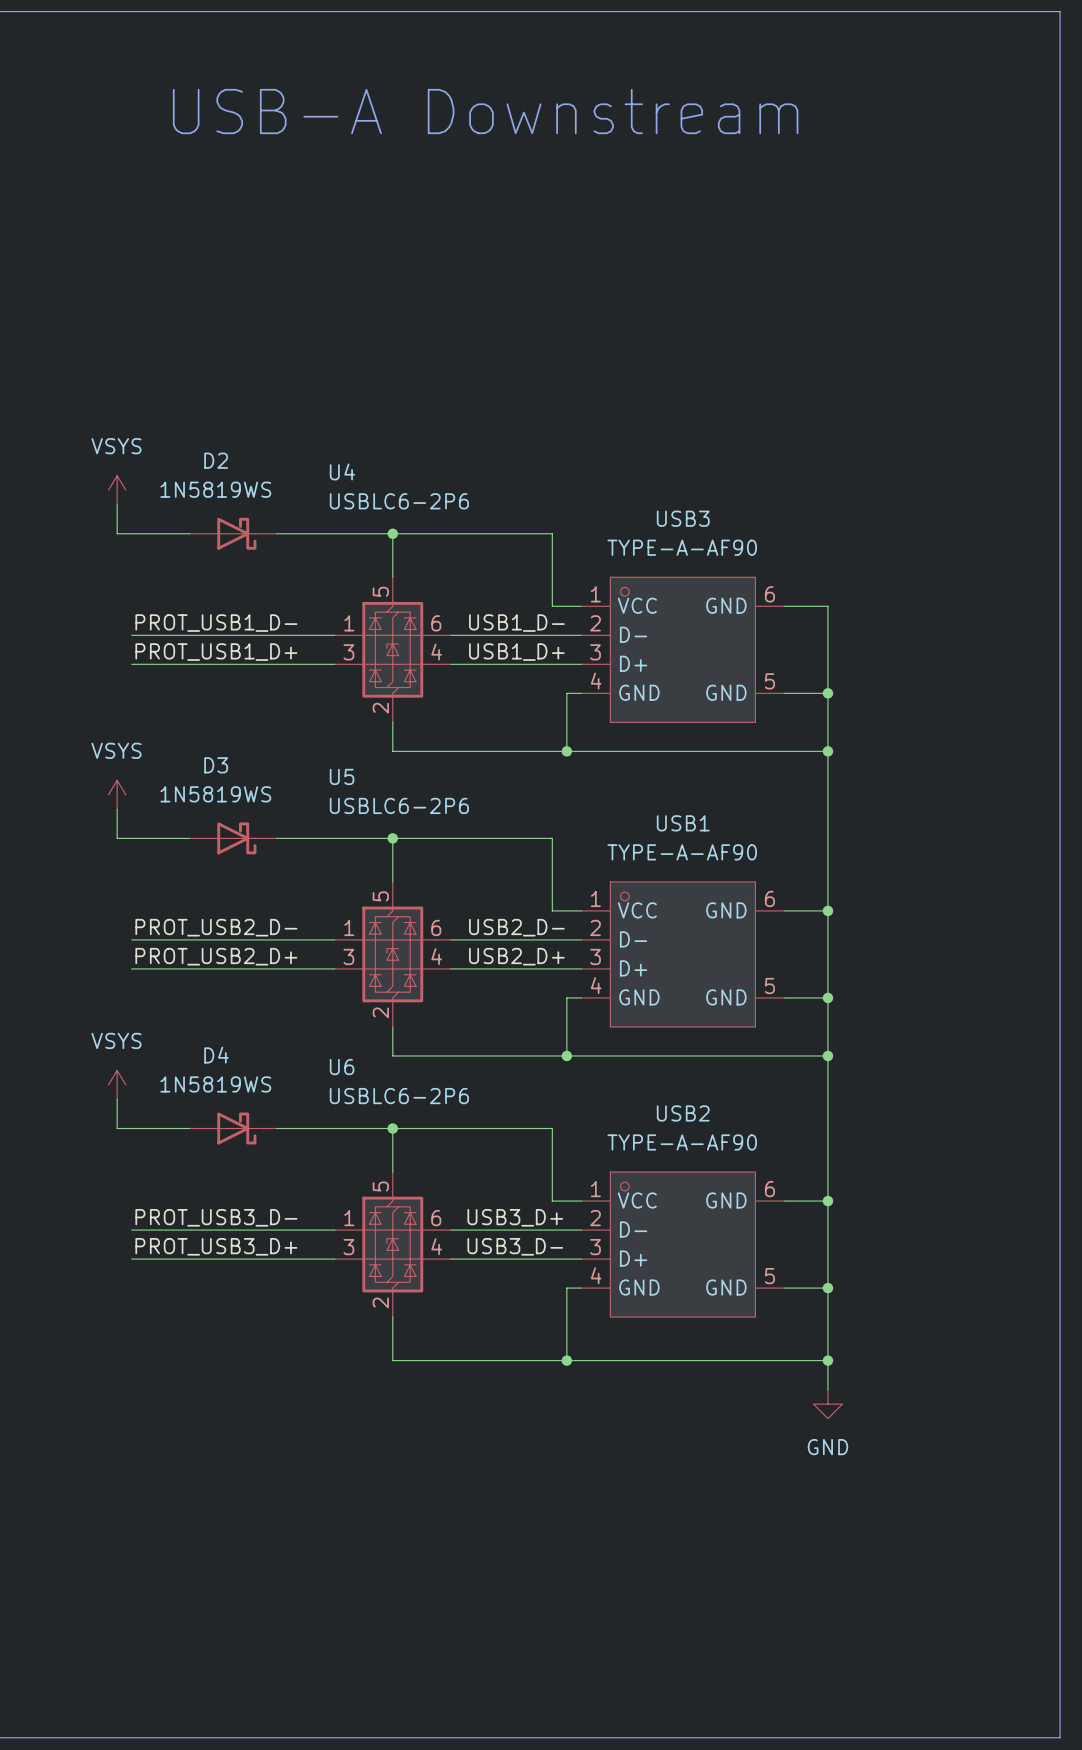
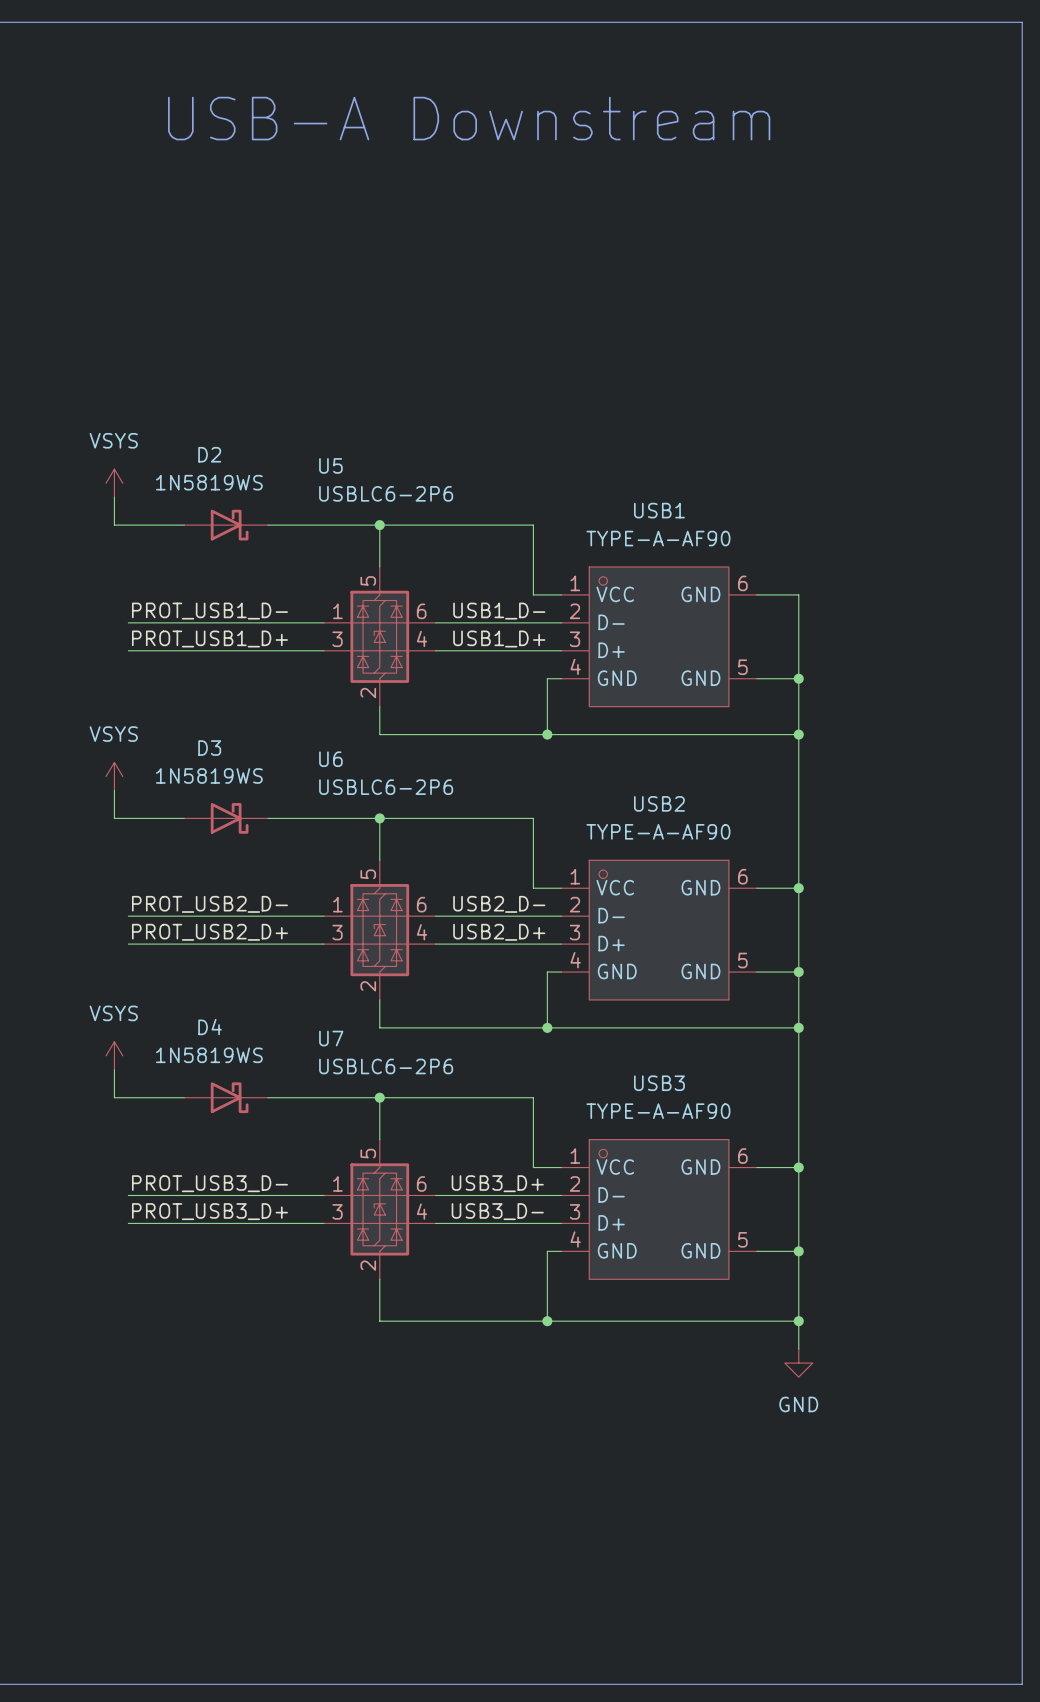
U4 name: U4 (342, 471) -> U5 (330, 465)
USB3 name: USB3 (683, 518) -> USB1 (659, 510)
U5 name: U5 (342, 776) -> U6 (330, 759)
USB1 name: USB1 (683, 823) -> USB2 (659, 803)
U6 name: U6 (342, 1067) -> U7 (331, 1038)
USB2 name: USB2 (683, 1113) -> USB3 (659, 1083)

